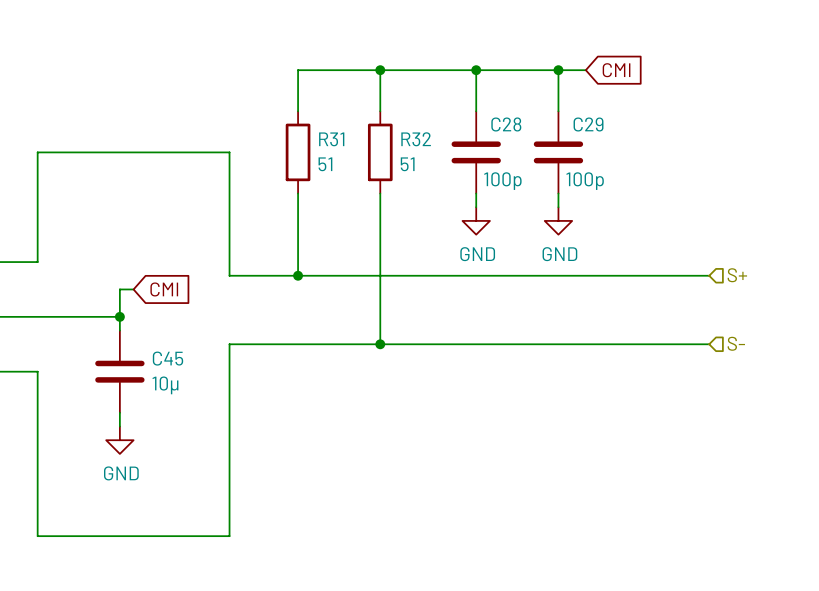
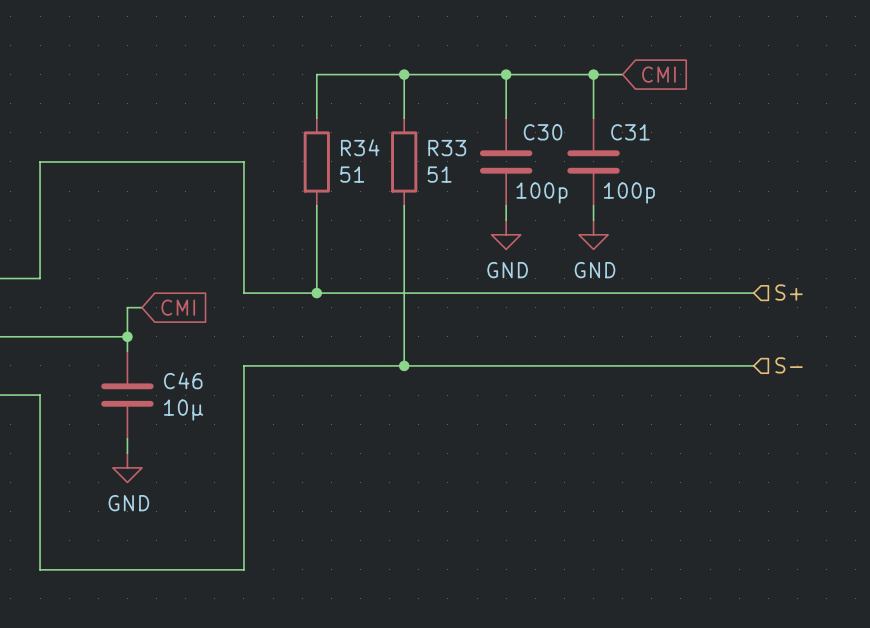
C28 name: C28 (506, 124) -> C30 (543, 132)
C29 name: C29 (588, 124) -> C31 (630, 132)
R31 name: R31 (331, 139) -> R34 (360, 147)
R32 name: R32 (416, 139) -> R33 (447, 148)
C45 name: C45 (168, 358) -> C46 (183, 380)

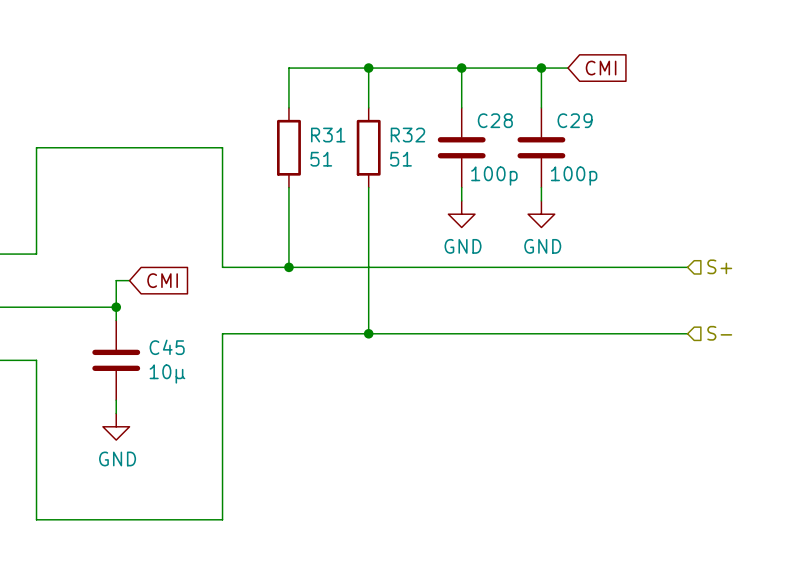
C30 name: C30 (543, 132) -> C28 (495, 120)
C31 name: C31 (630, 132) -> C29 (575, 120)
R34 name: R34 (360, 147) -> R31 (328, 135)
R33 name: R33 (447, 148) -> R32 (407, 135)
C46 name: C46 (183, 380) -> C45 (167, 347)

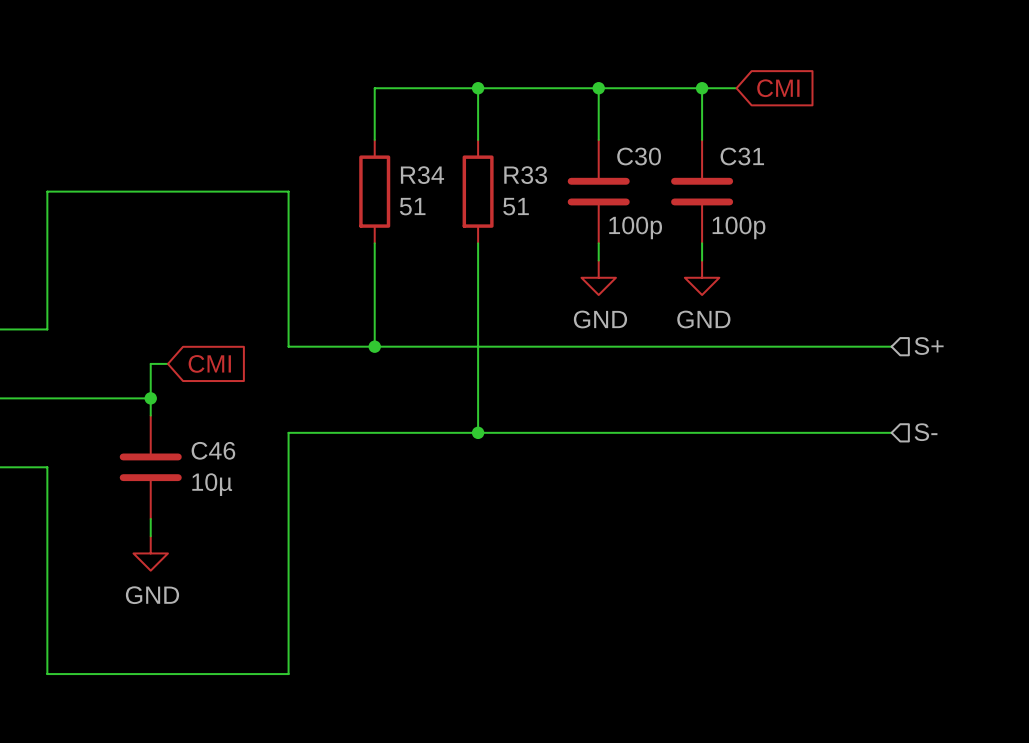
C28 name: C28 (495, 120) -> C30 (639, 156)
C29 name: C29 (575, 120) -> C31 (742, 156)
R31 name: R31 (328, 135) -> R34 (422, 175)
R32 name: R32 (407, 135) -> R33 (525, 175)
C45 name: C45 (167, 347) -> C46 (213, 450)

